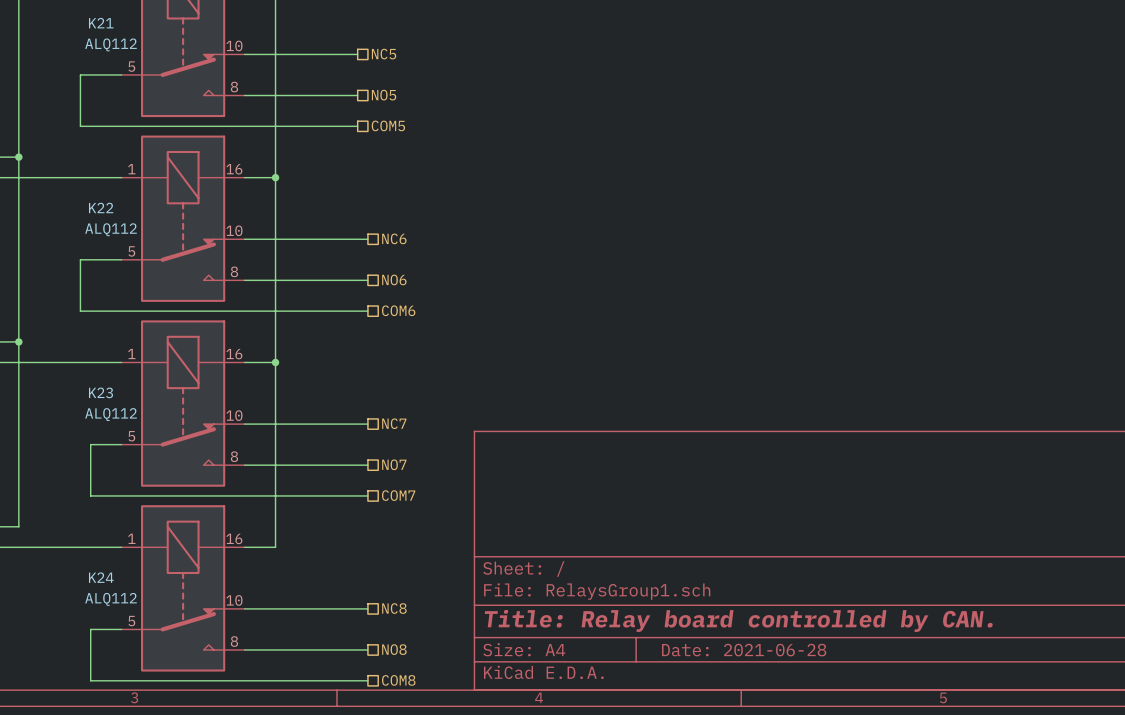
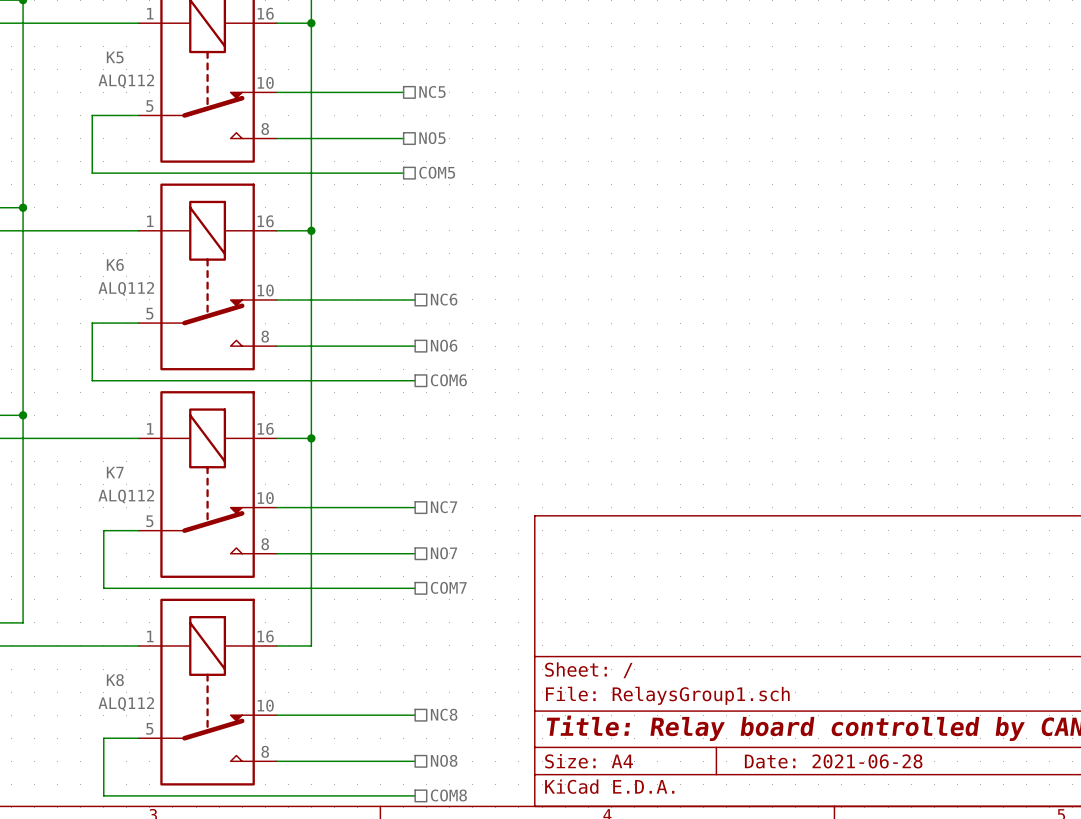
K21 name: K21 (101, 23) -> K5 (115, 57)
K22 name: K22 (101, 207) -> K6 (115, 264)
K23 name: K23 (100, 392) -> K7 (115, 472)
K24 name: K24 (101, 577) -> K8 (115, 680)

